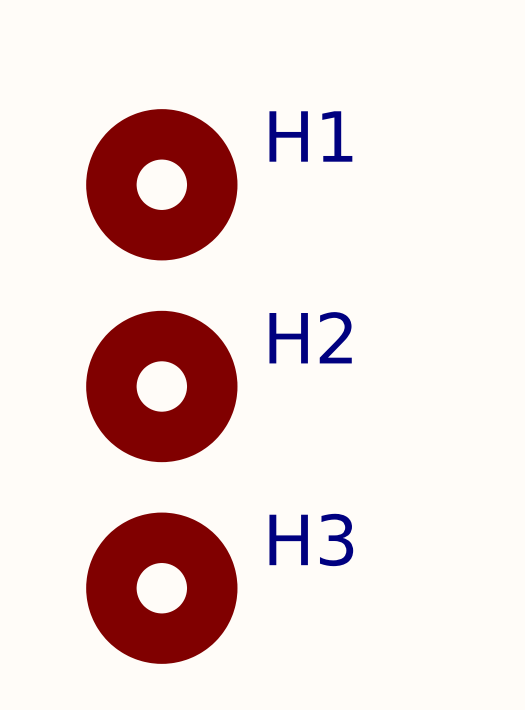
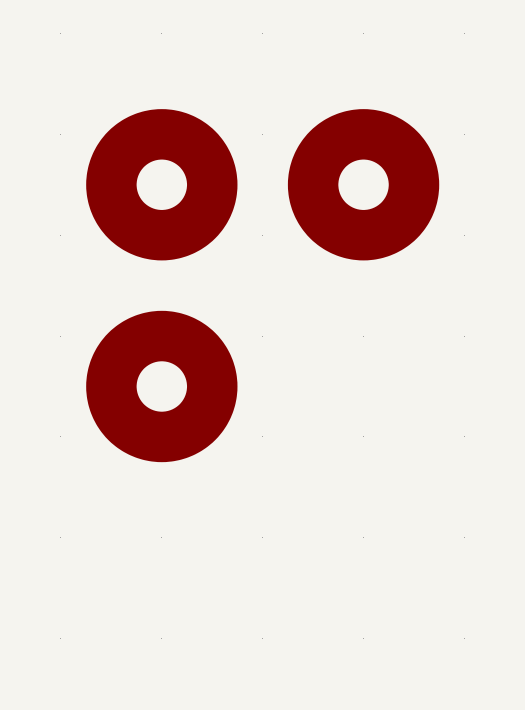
H1 name: H1 (310, 136) -> none
part: none -> (363, 184)
H2 name: H2 (310, 337) -> none
H3: (161, 588) -> none

